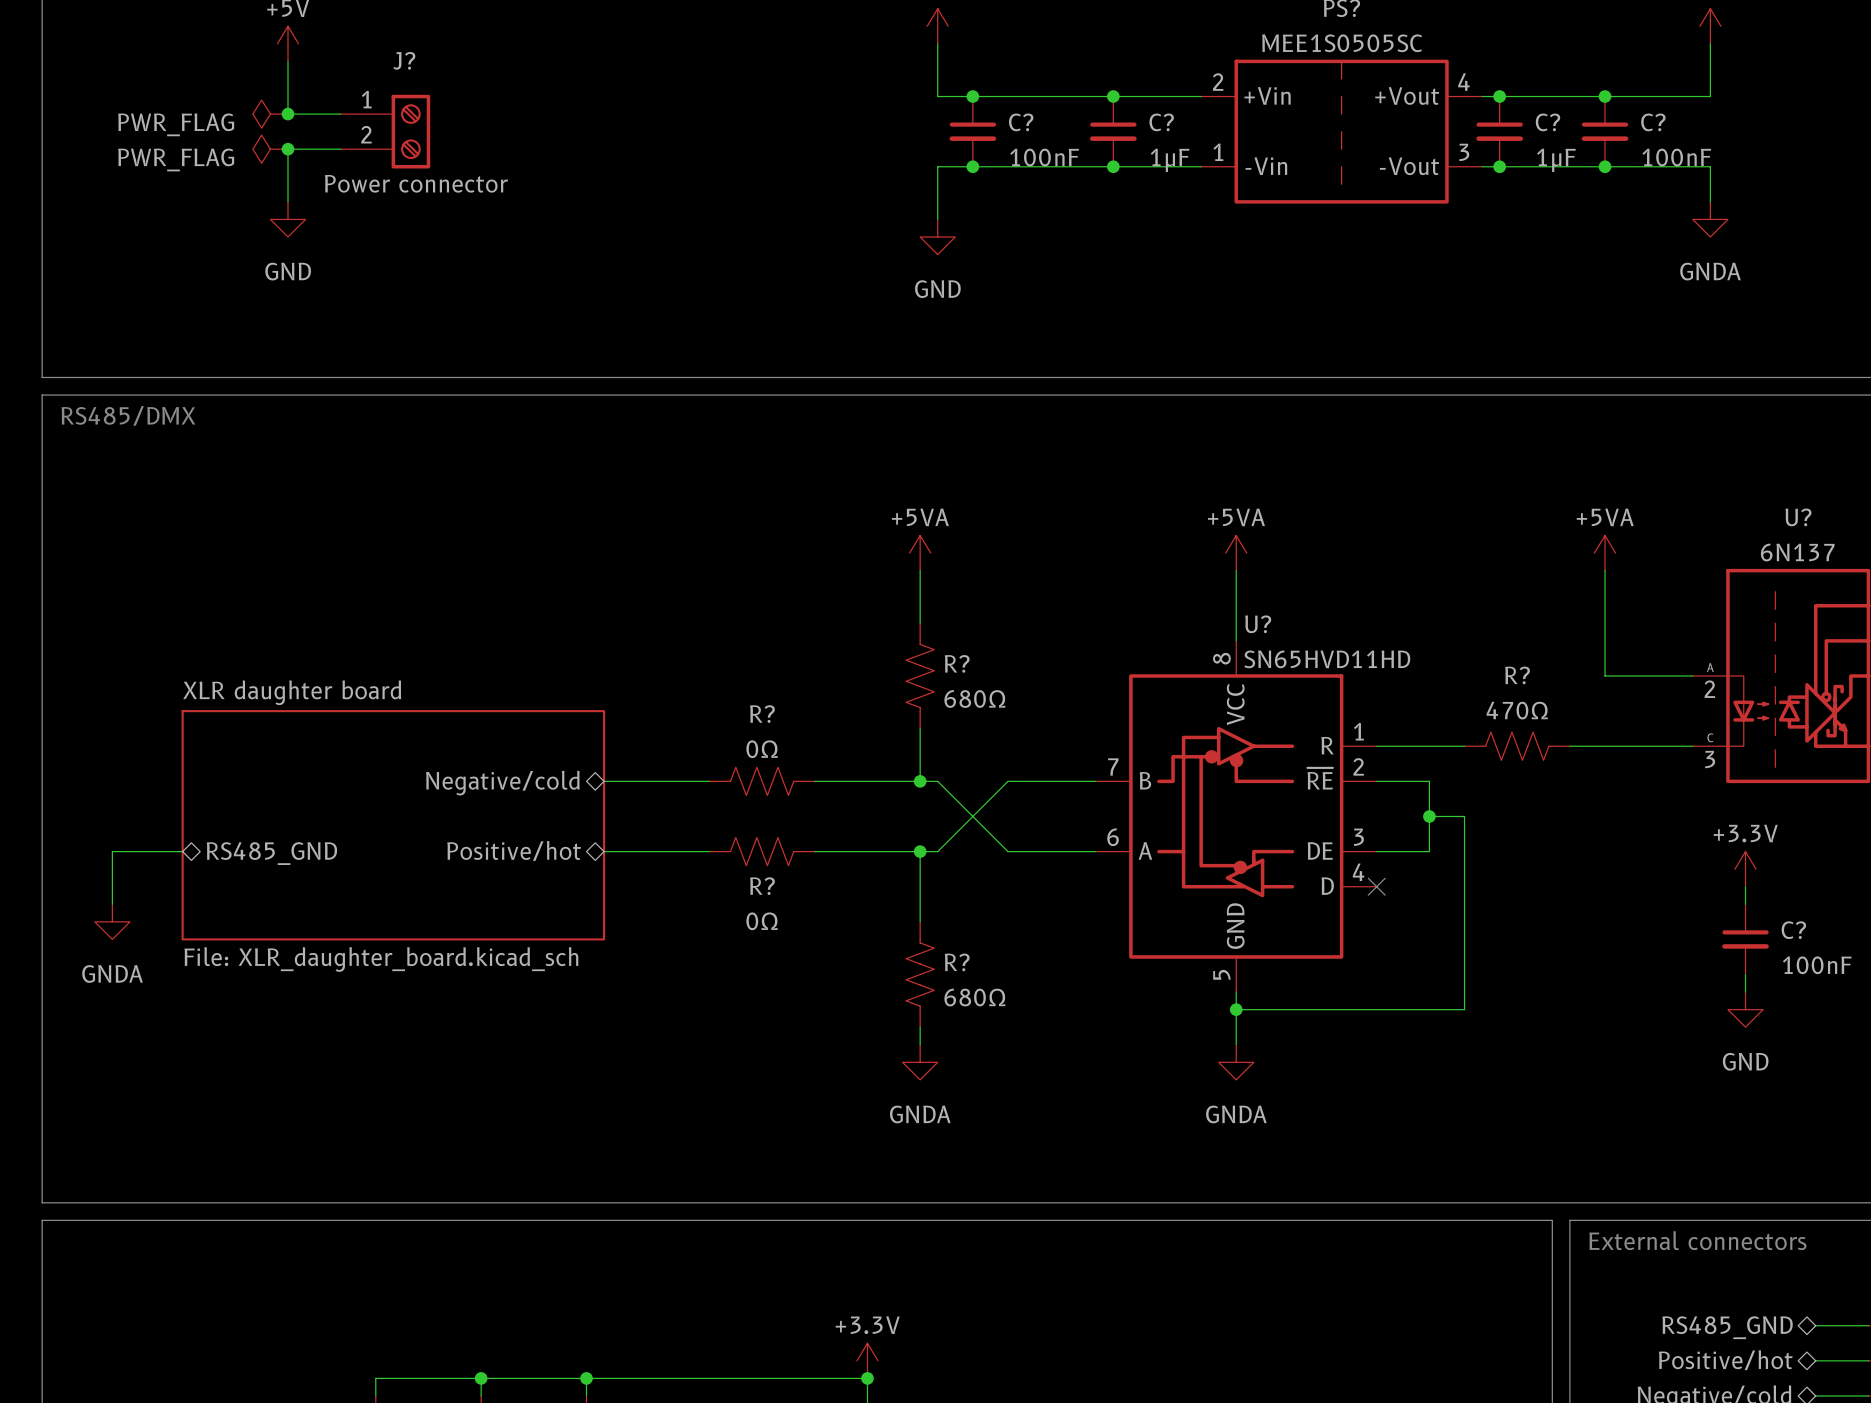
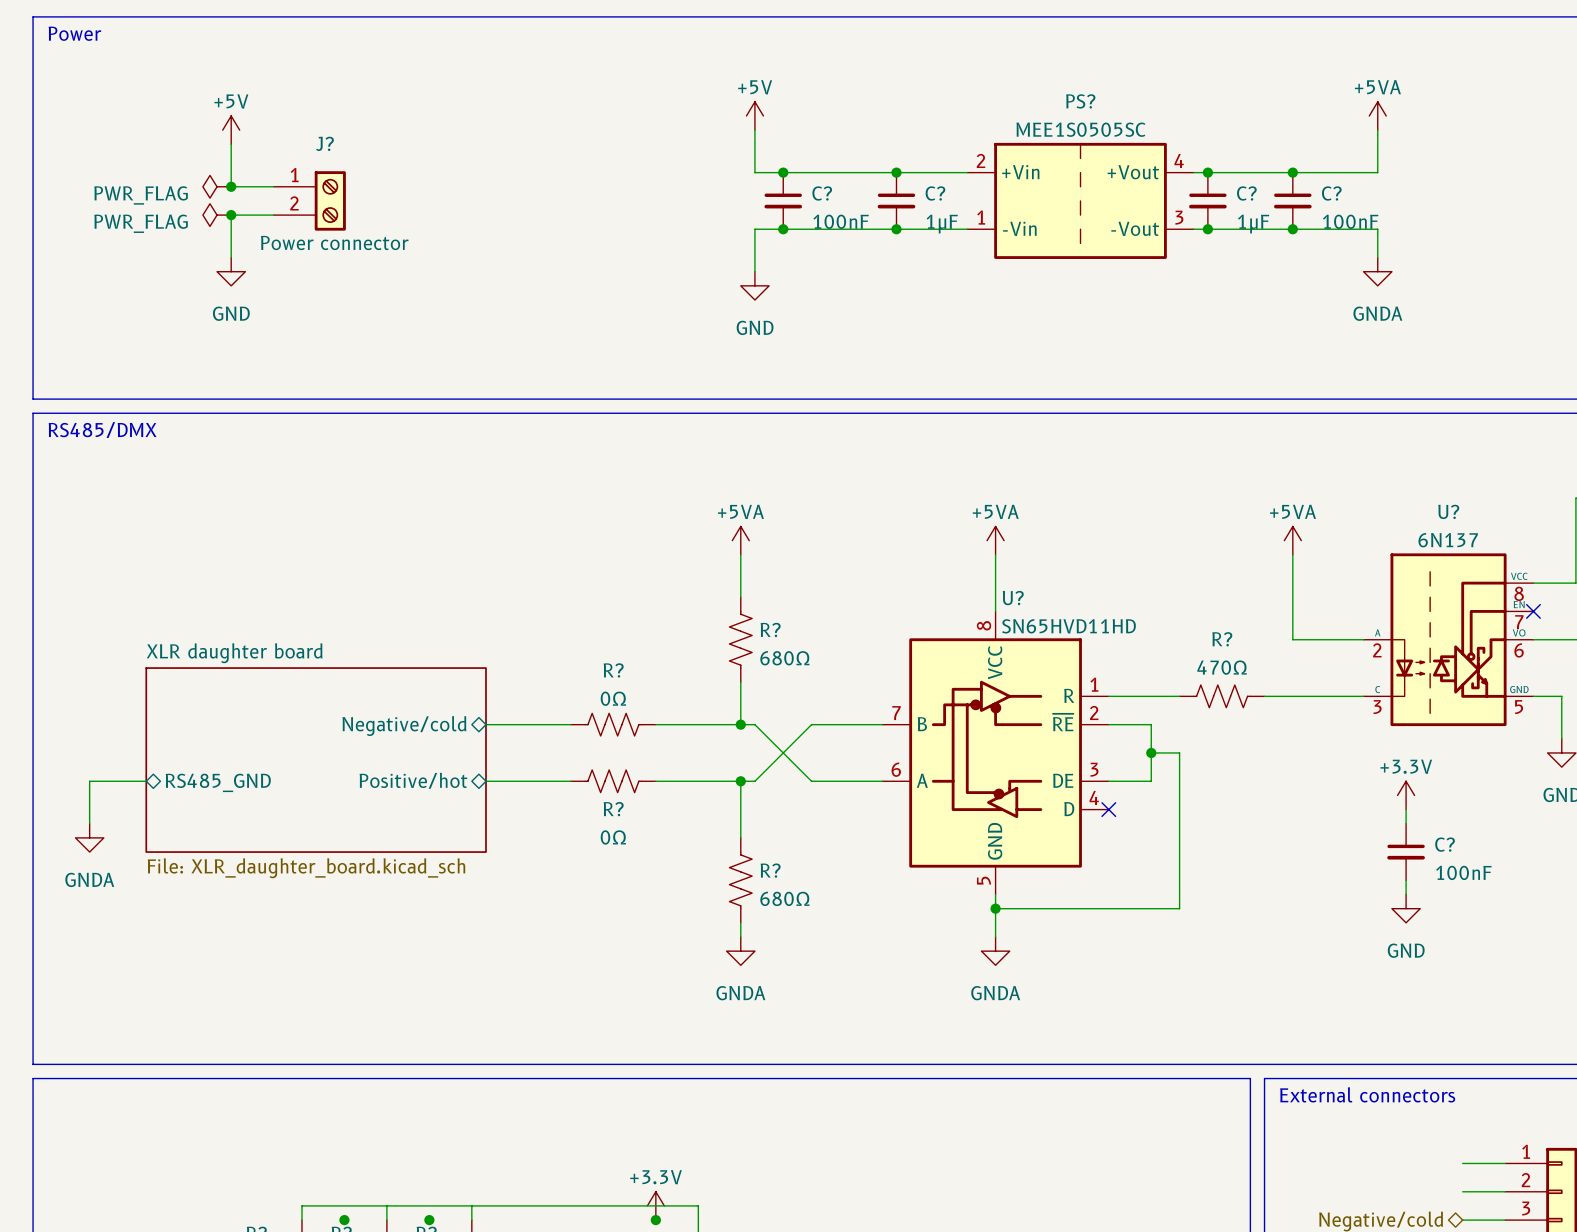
hierarchical label: RS485_GND (1727, 1327) -> none
power symbol position: +3.3V (867, 1360) -> +3.3V (655, 1205)
hierarchical label: Positive/hot (1725, 1360) -> none
junction: (481, 1378) -> none
junction: (586, 1378) -> none
junction position: (867, 1378) -> (655, 1220)
junction: none -> (344, 1220)
junction: none -> (429, 1220)

